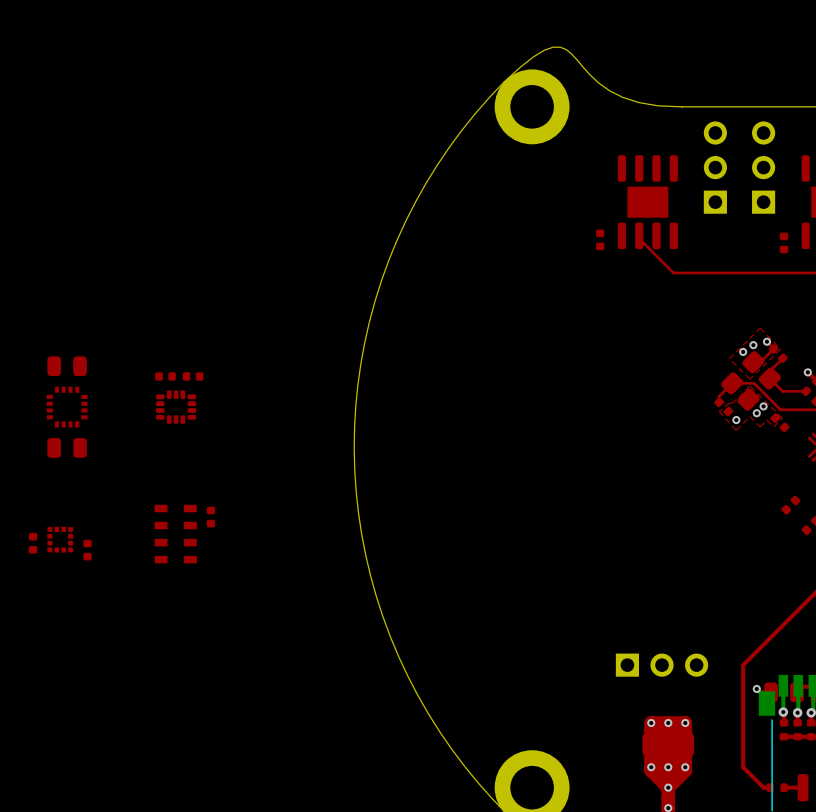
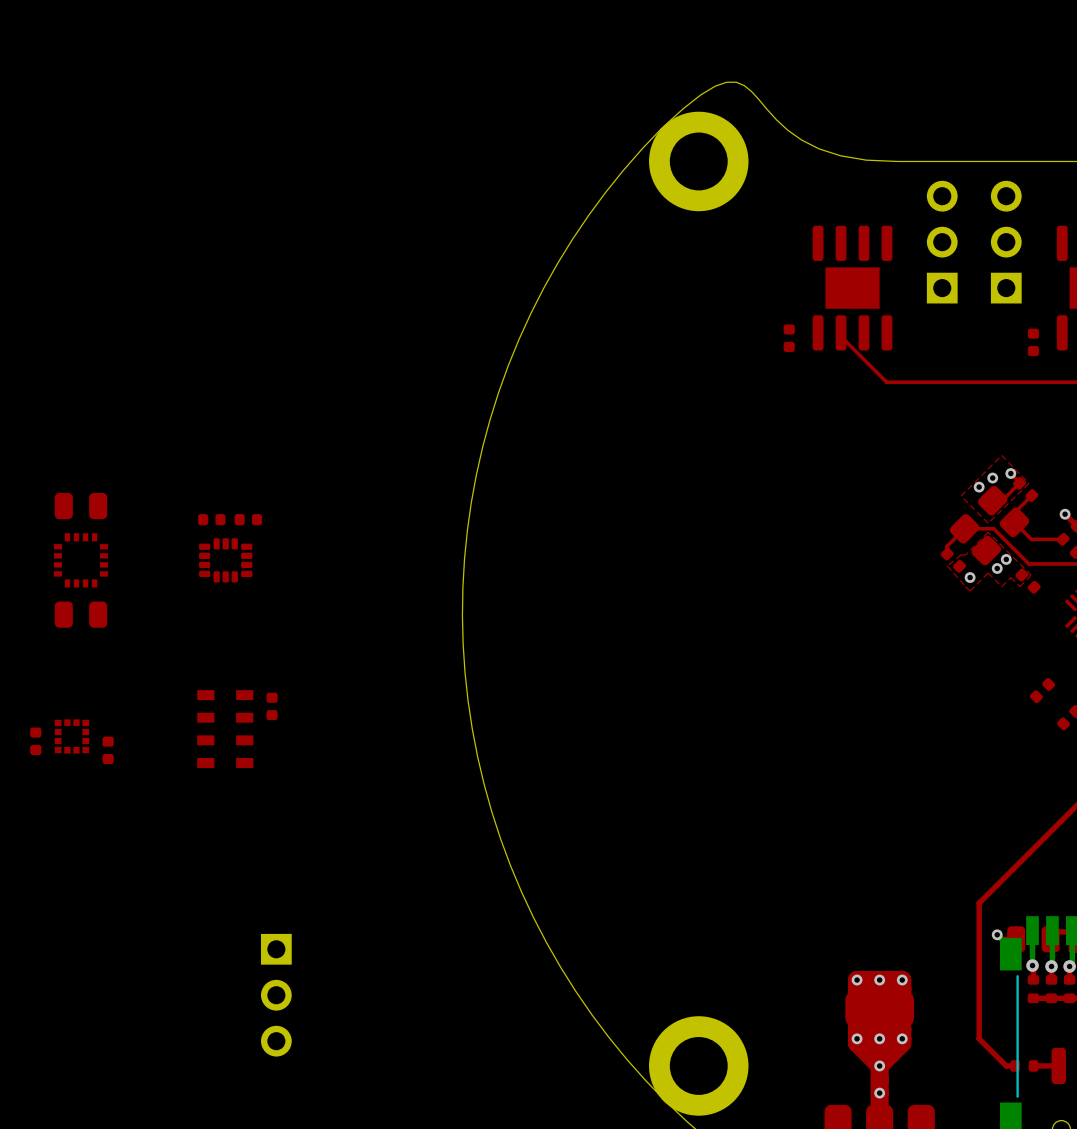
part: (662, 665) -> none
part: none -> (276, 995)

